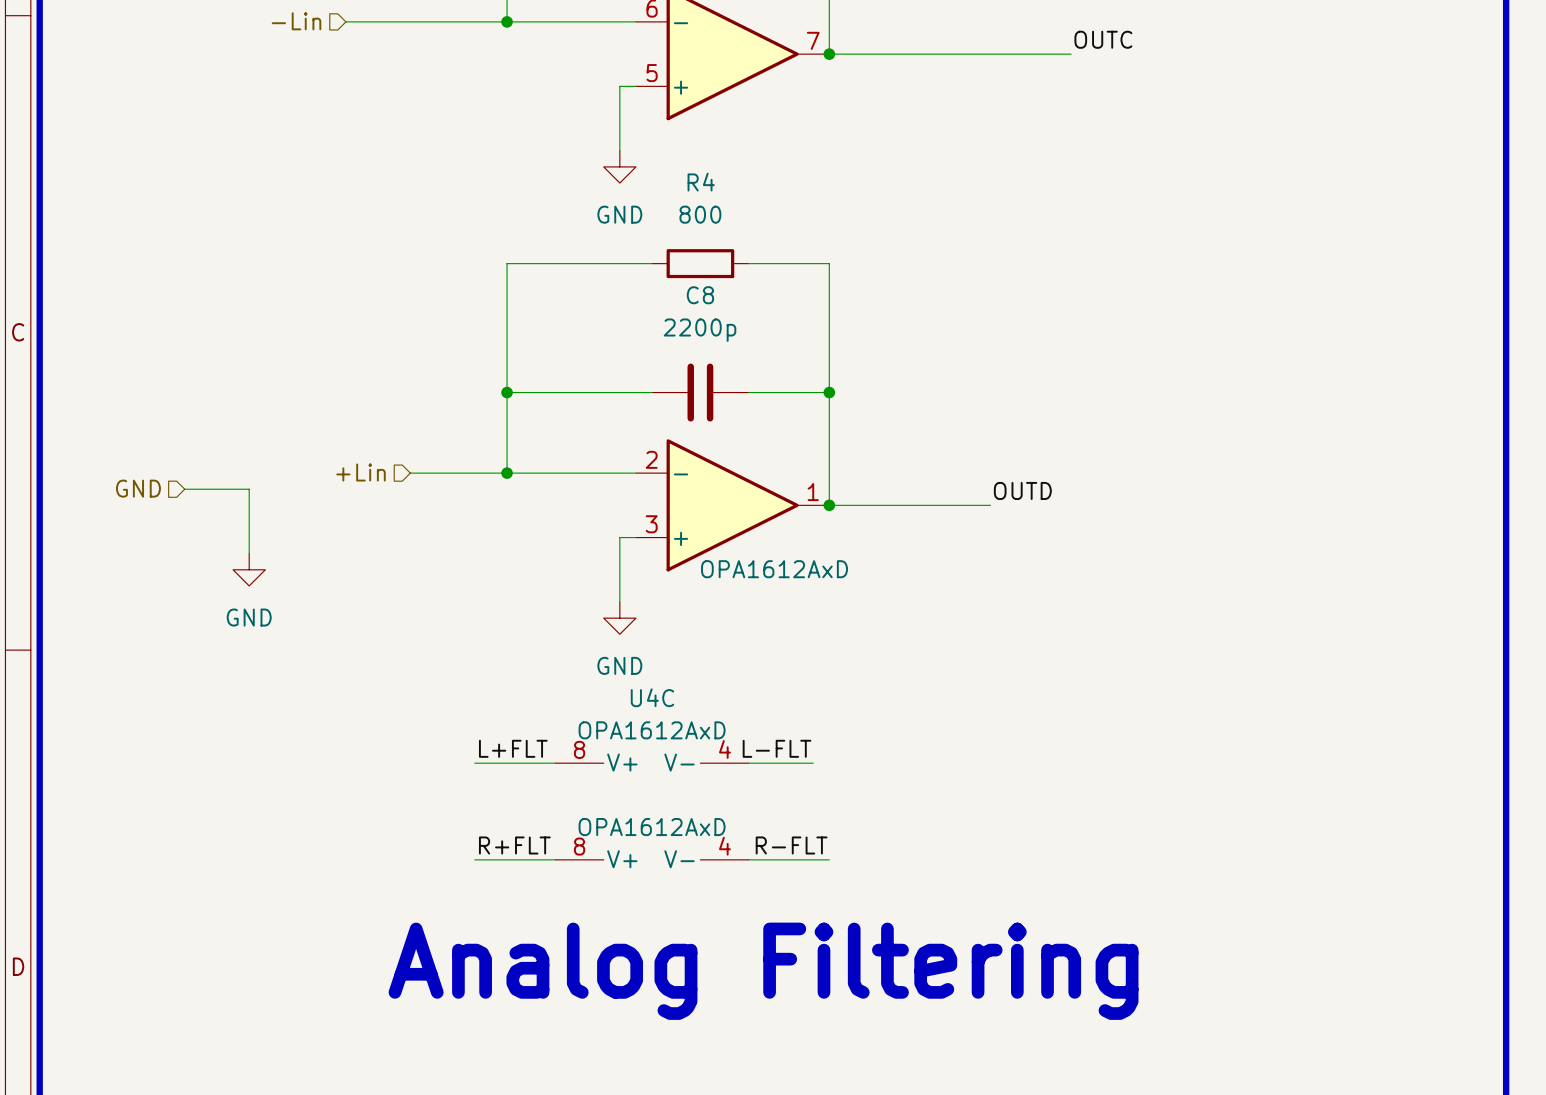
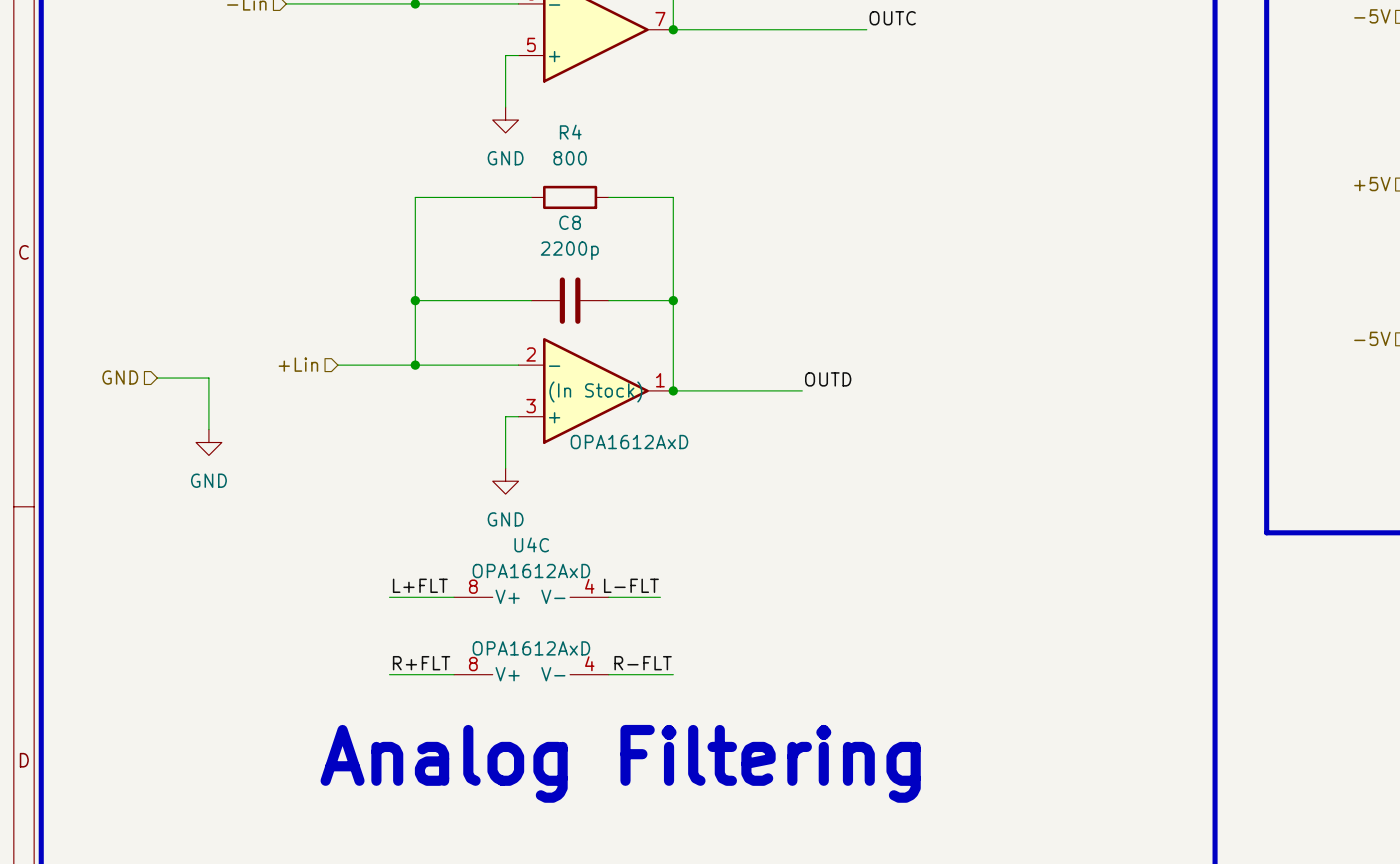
part text: none -> (In Stock) (595, 391)

